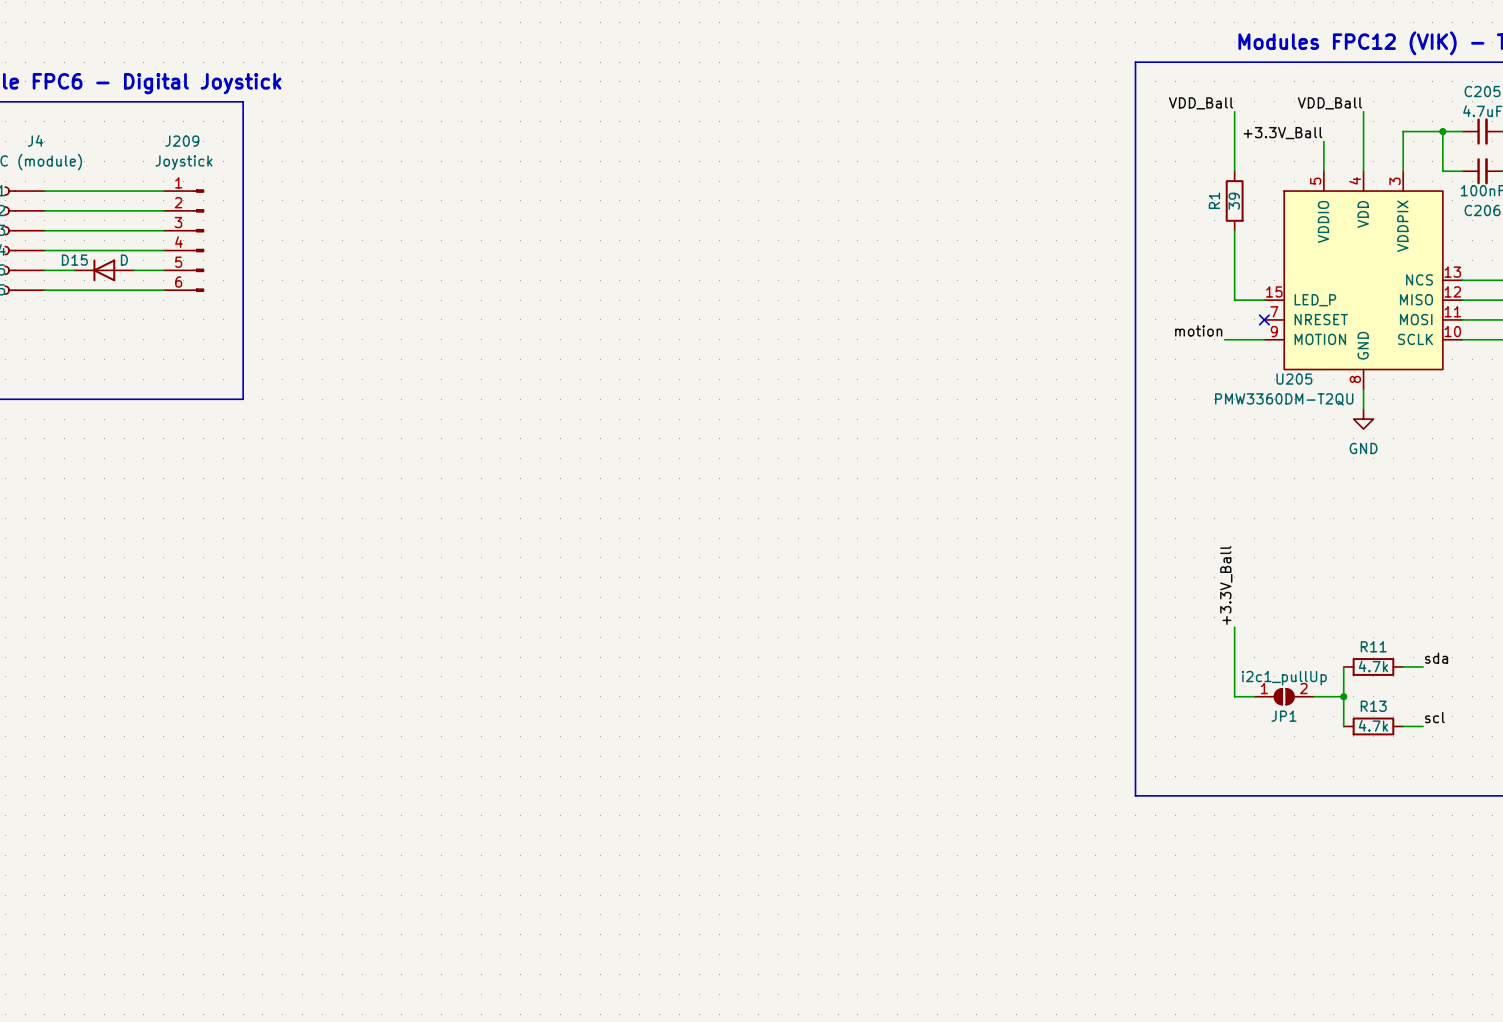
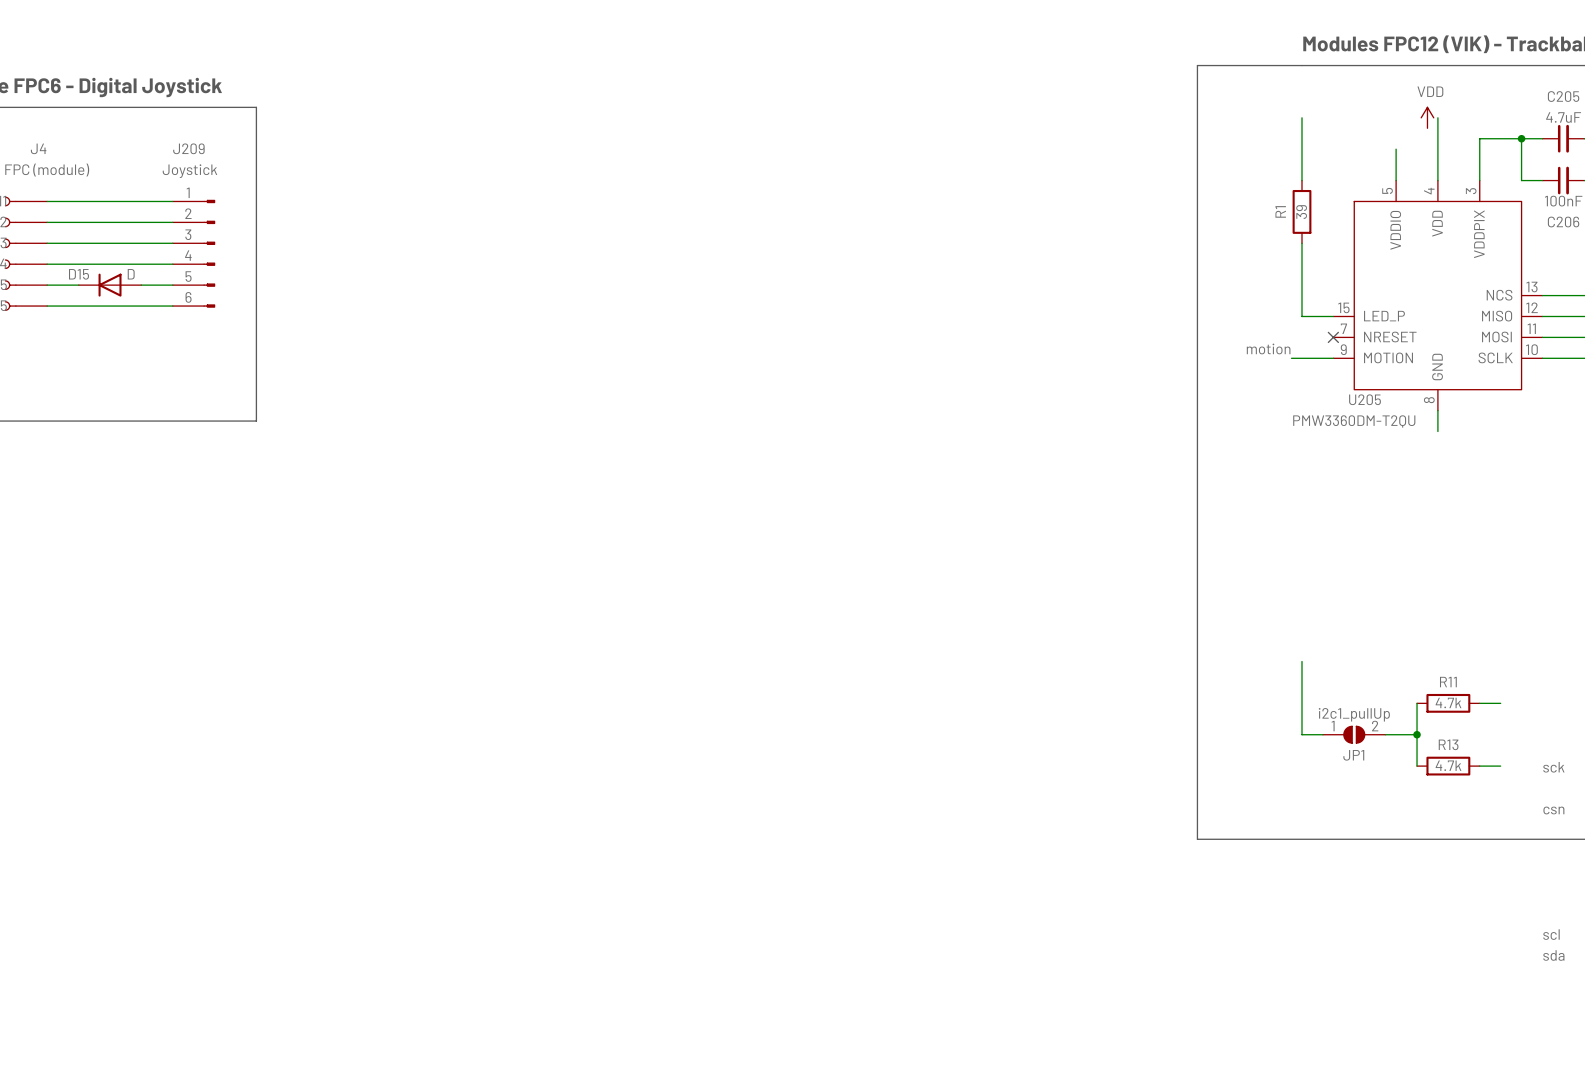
label: VDD_Ball (1201, 103) -> none
label: VDD_Ball (1329, 103) -> none
power symbol: none -> VDD (1427, 117)
label: +3.3V_Ball (1282, 133) -> none
power symbol: GND (1363, 419) -> none
label: +3.3V_Ball (1226, 585) -> none
label: sda (1436, 658) -> none
label position: scl (1434, 717) -> scl (1551, 934)
label: none -> sck (1553, 767)
label: none -> csn (1553, 810)
label: none -> sda (1553, 955)

